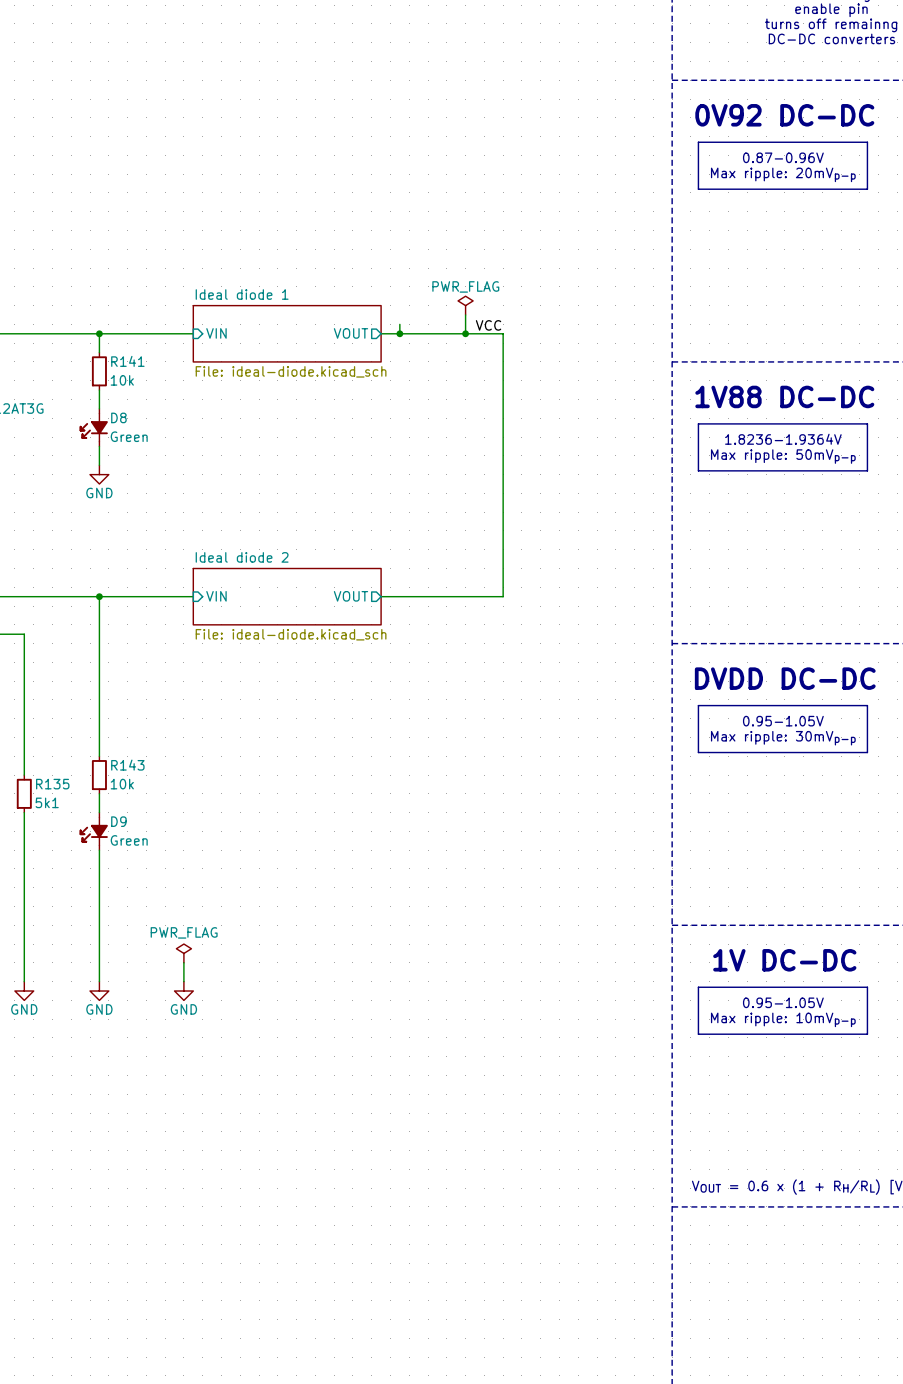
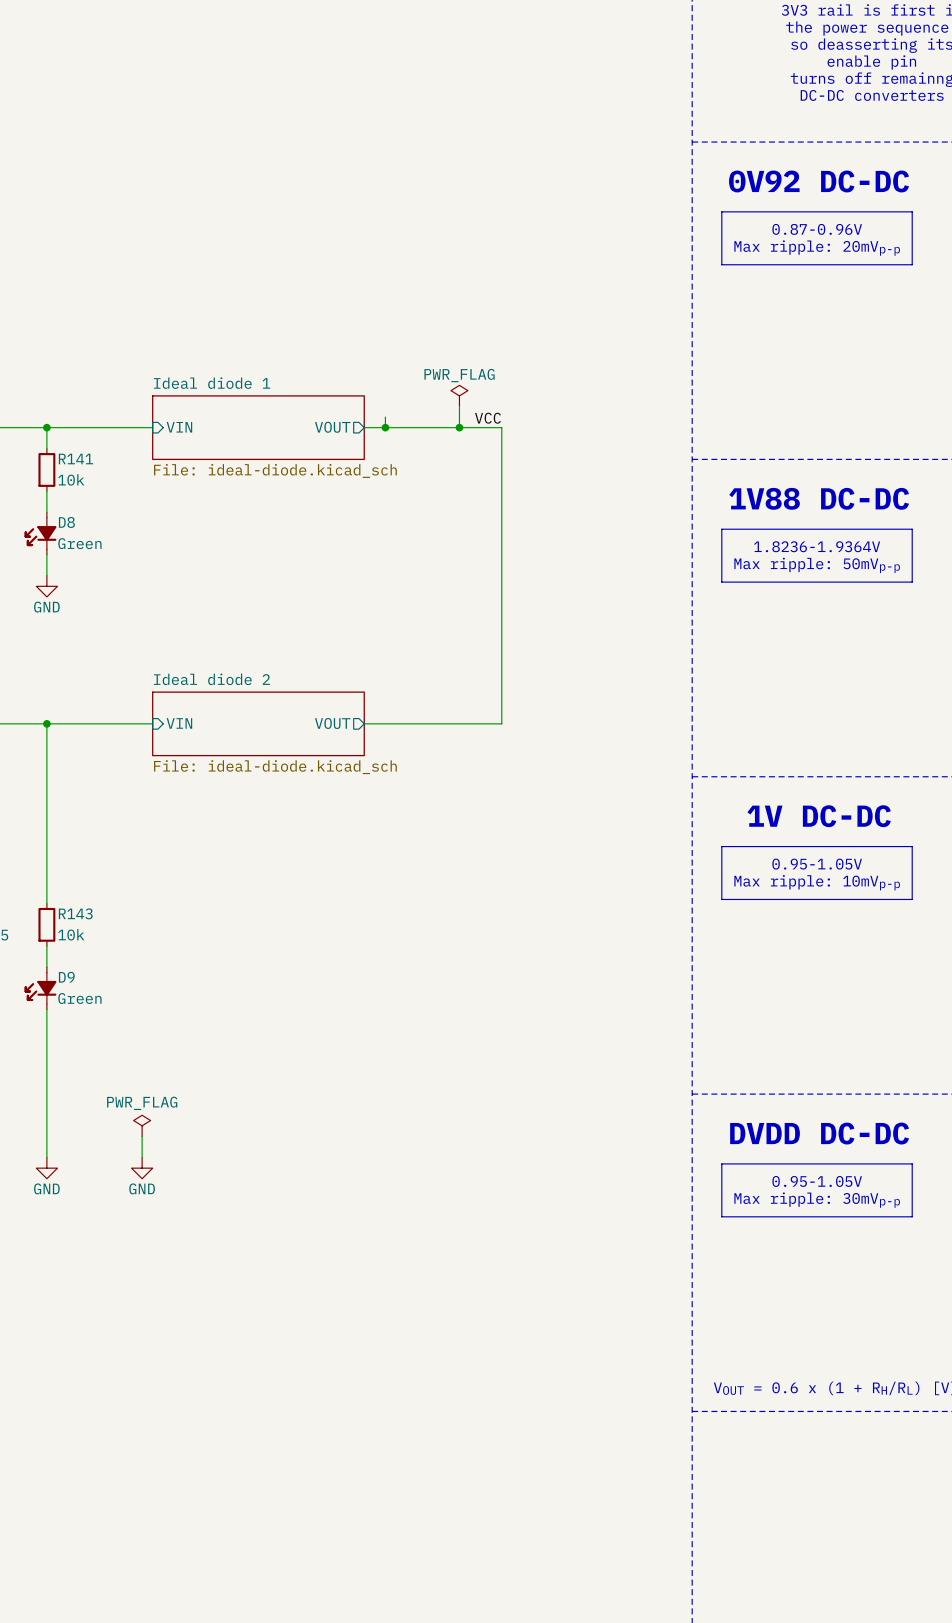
text: DVDD DC-DC (785, 678) -> 1V DC-DC (819, 816)
text: Max ripple: 30mVp-p (783, 738) -> Max ripple: 10mVp-p (817, 882)
text: 1V DC-DC (784, 960) -> DVDD DC-DC (819, 1133)
text: Max ripple: 10mVp-p (783, 1019) -> Max ripple: 30mVp-p (817, 1200)

